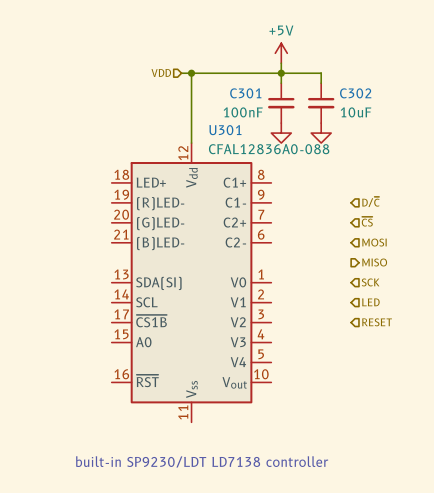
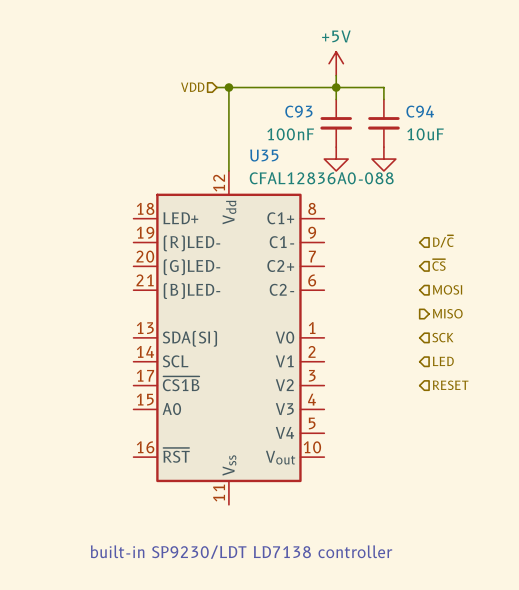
C301 name: C301 (245, 93) -> C93 (298, 111)
C302 name: C302 (355, 93) -> C94 (420, 111)
U301 name: U301 (225, 130) -> U35 (264, 155)

